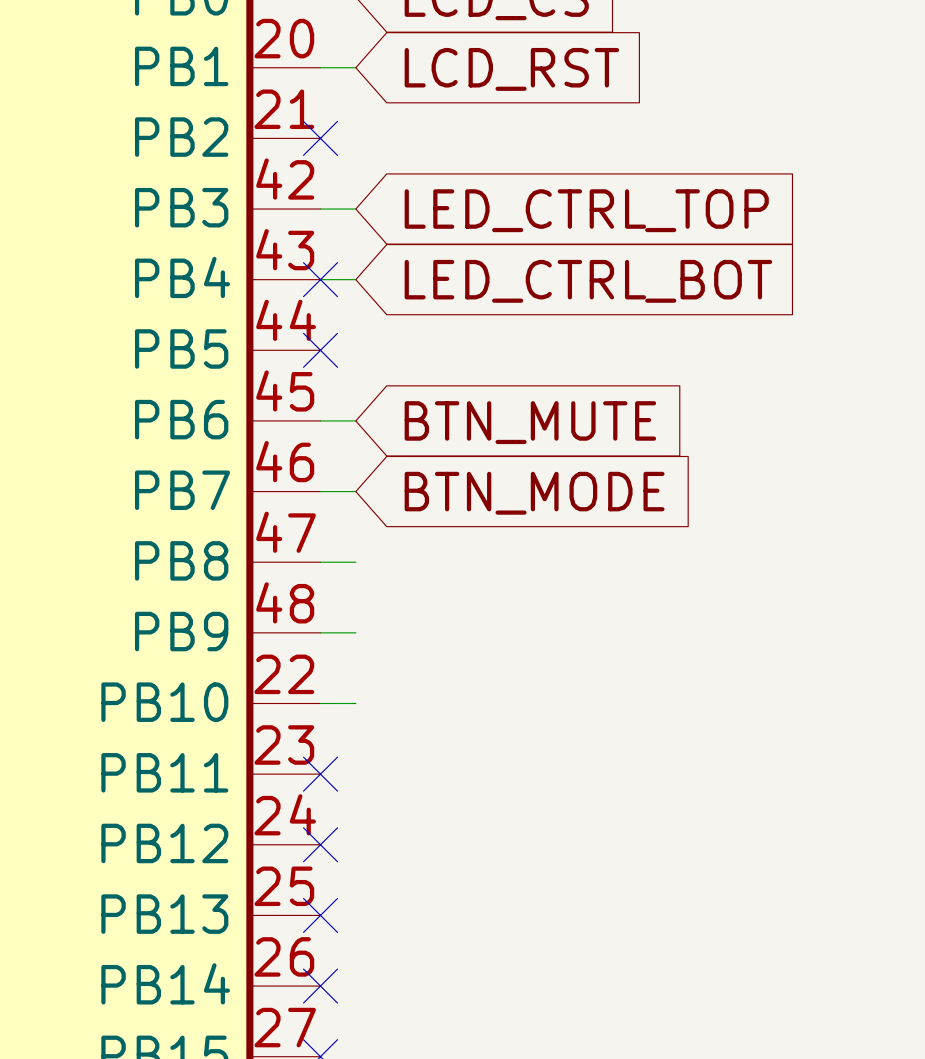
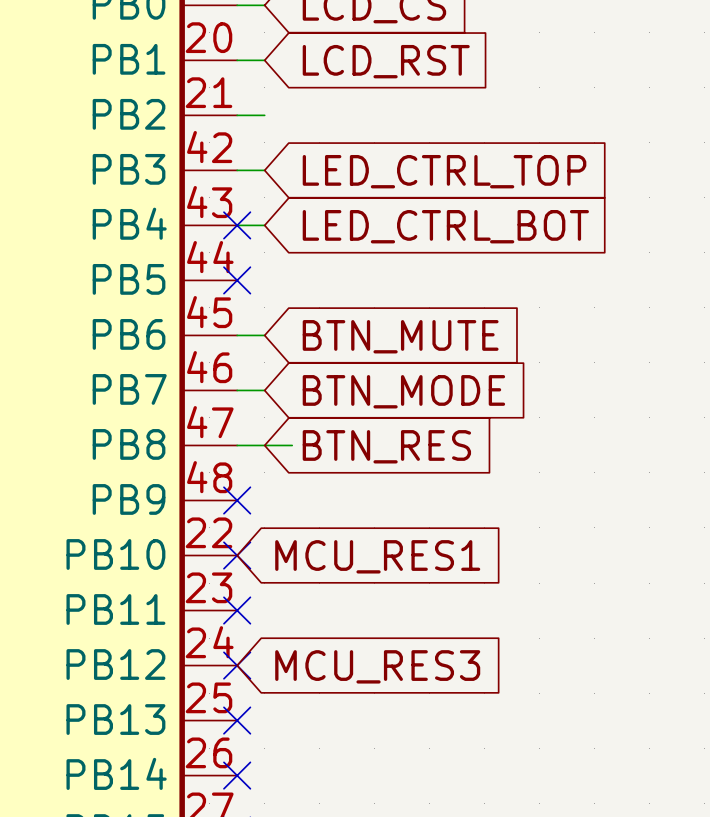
no-connect mark: (320, 138) -> none
global label: none -> BTN_RES (386, 446)
wire: (320, 632) (355, 632) -> (264, 445) (292, 445)
no-connect mark: none -> (237, 500)
wire: (320, 703) (355, 703) -> (237, 115) (264, 115)
no-connect mark: none -> (237, 555)
global label: none -> MCU_RES1 (377, 556)
global label: none -> MCU_RES3 (377, 666)

